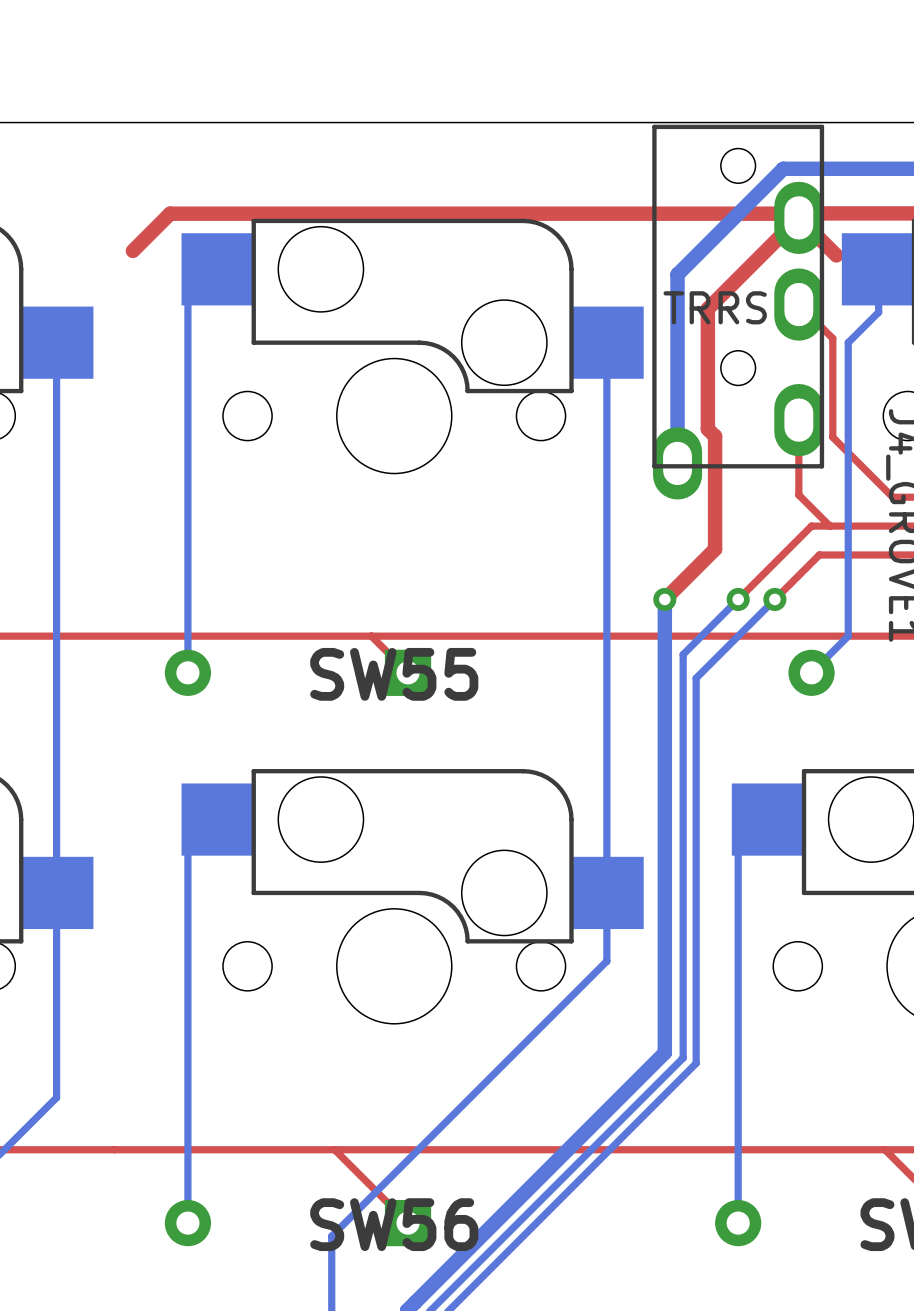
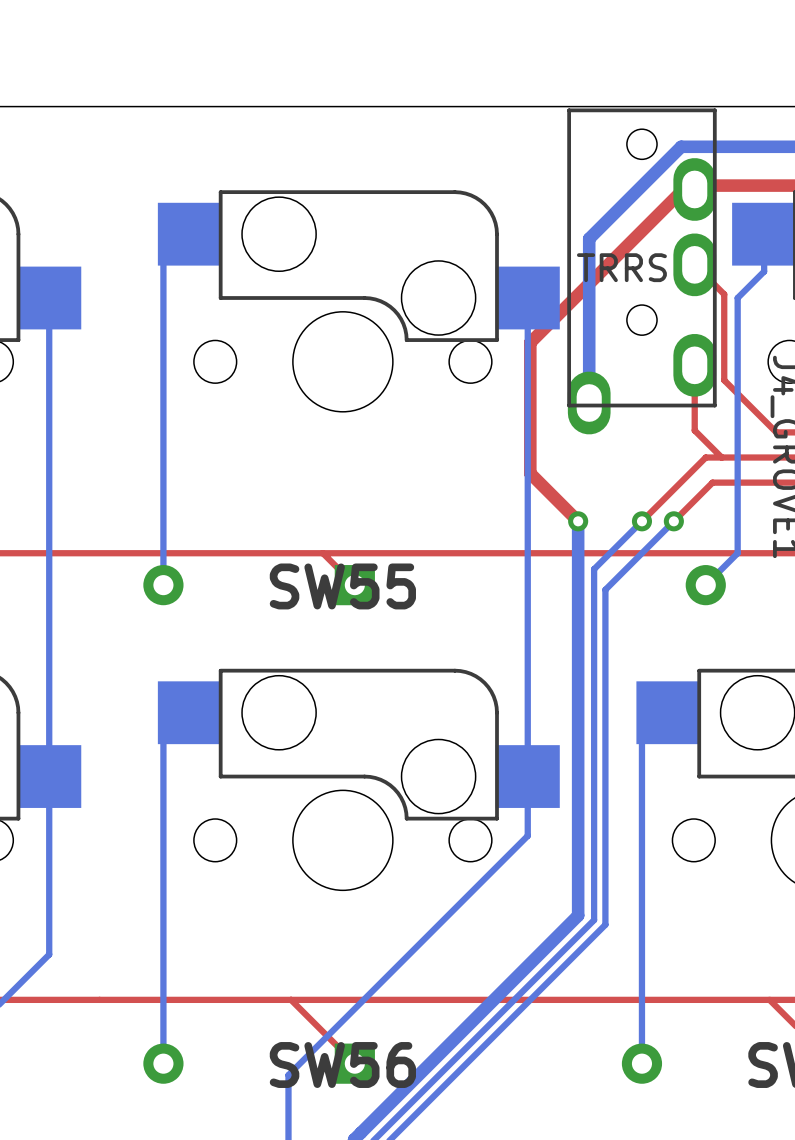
top track: (794, 213) (170, 213) (132, 250) -> none
top track: (836, 255) (798, 217) (707, 308) (707, 429) (715, 436) (715, 549) (664, 599) -> (694, 191) (694, 189) (683, 189) (530, 342) (530, 473) (578, 521)

